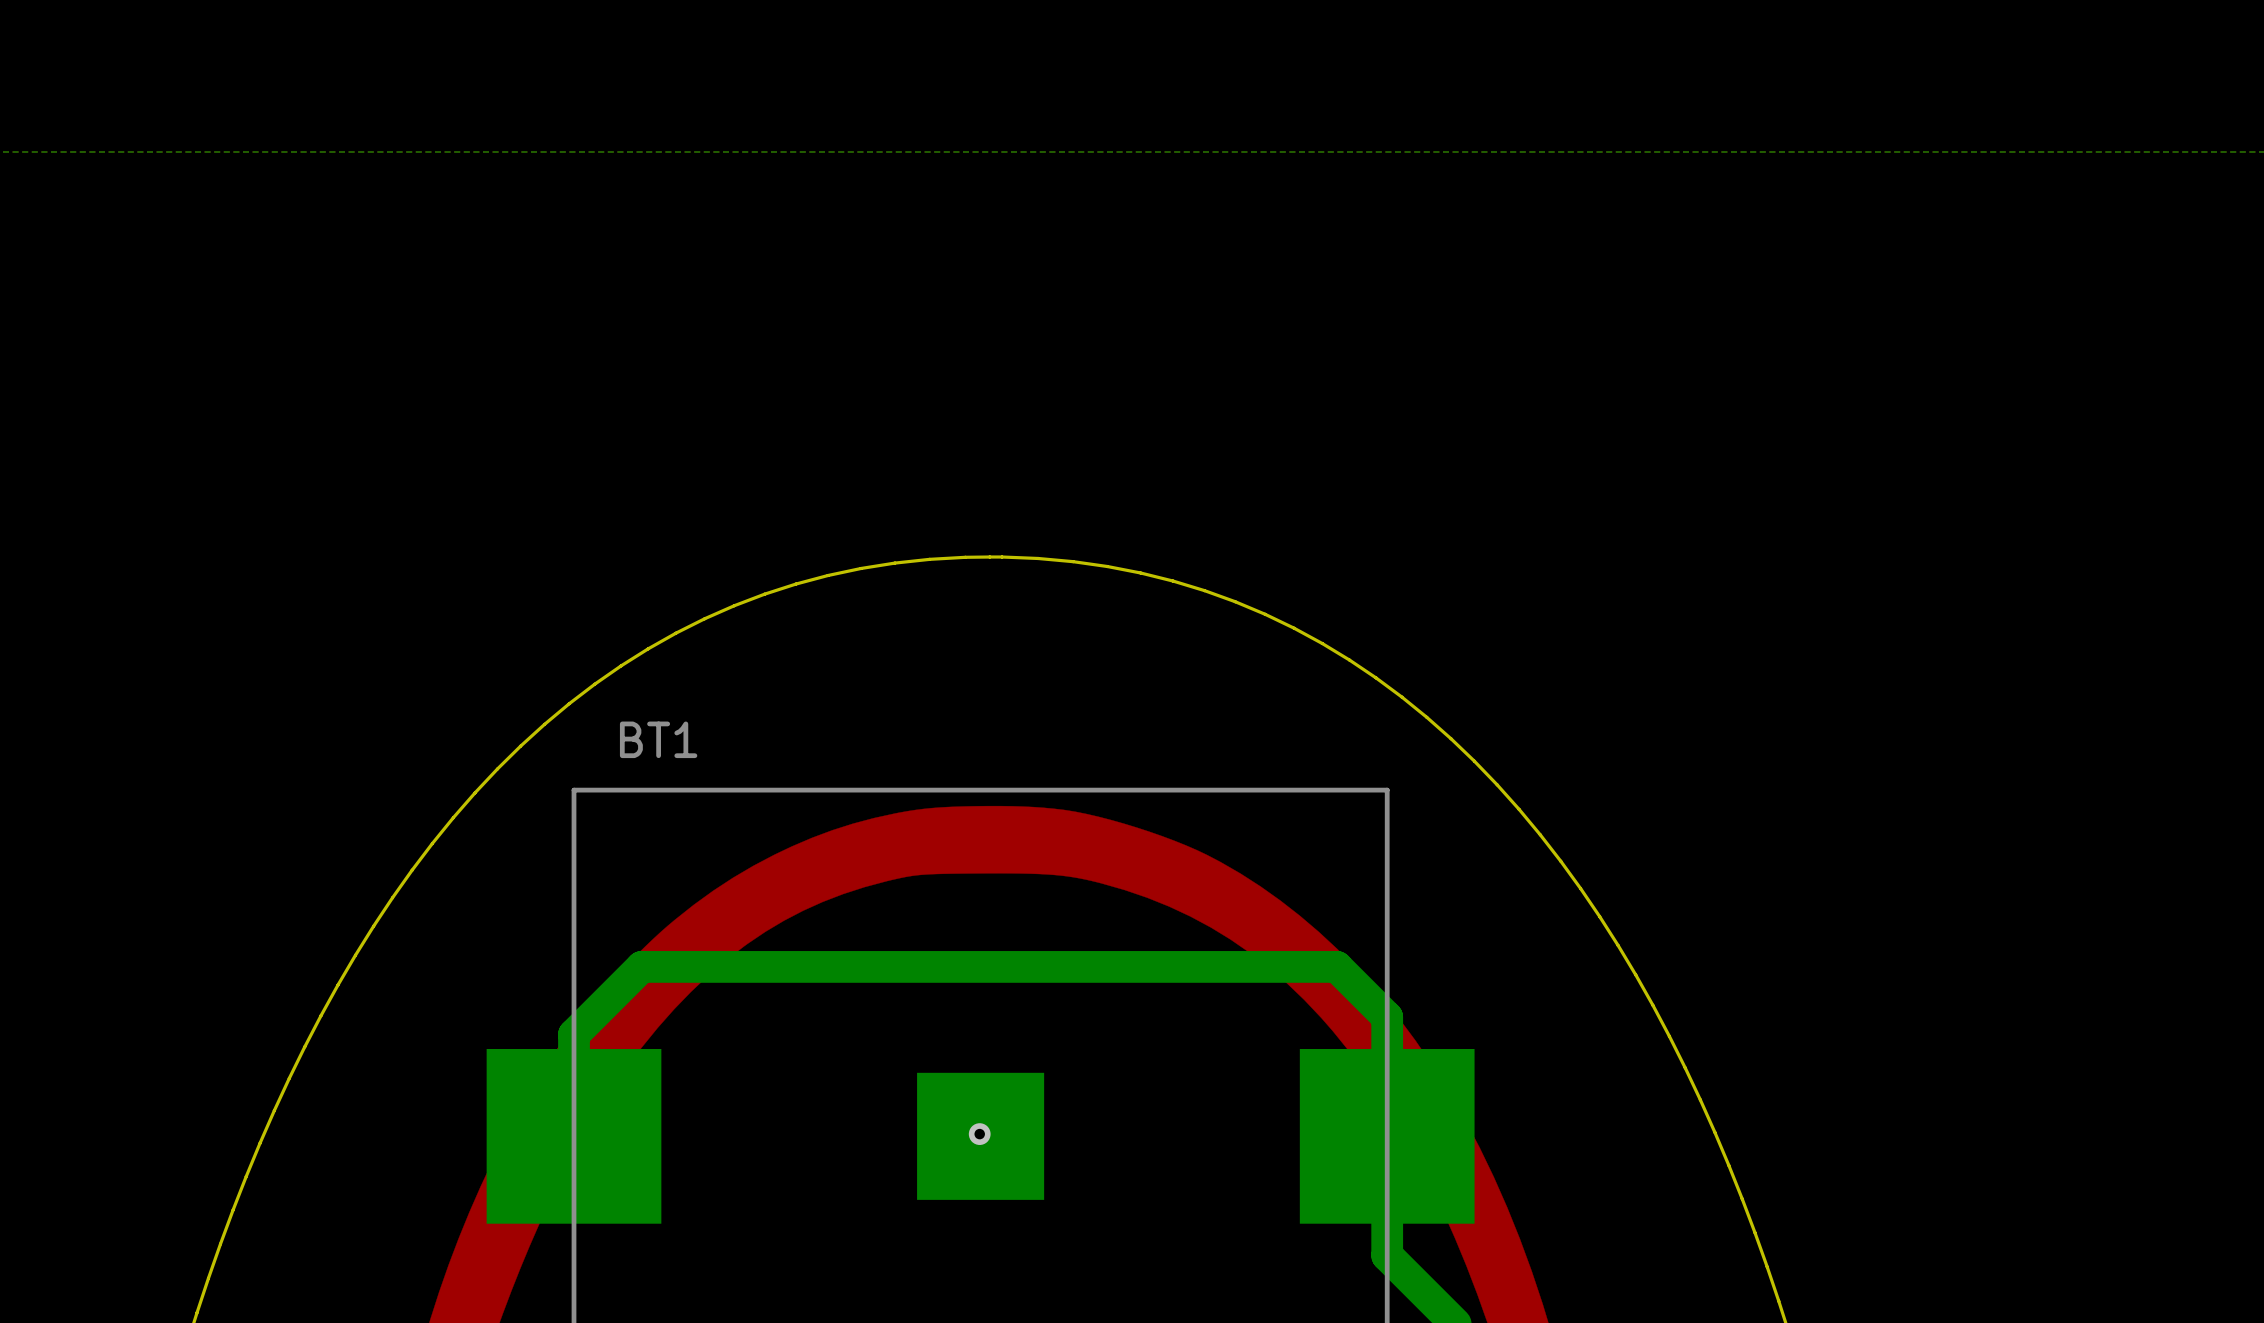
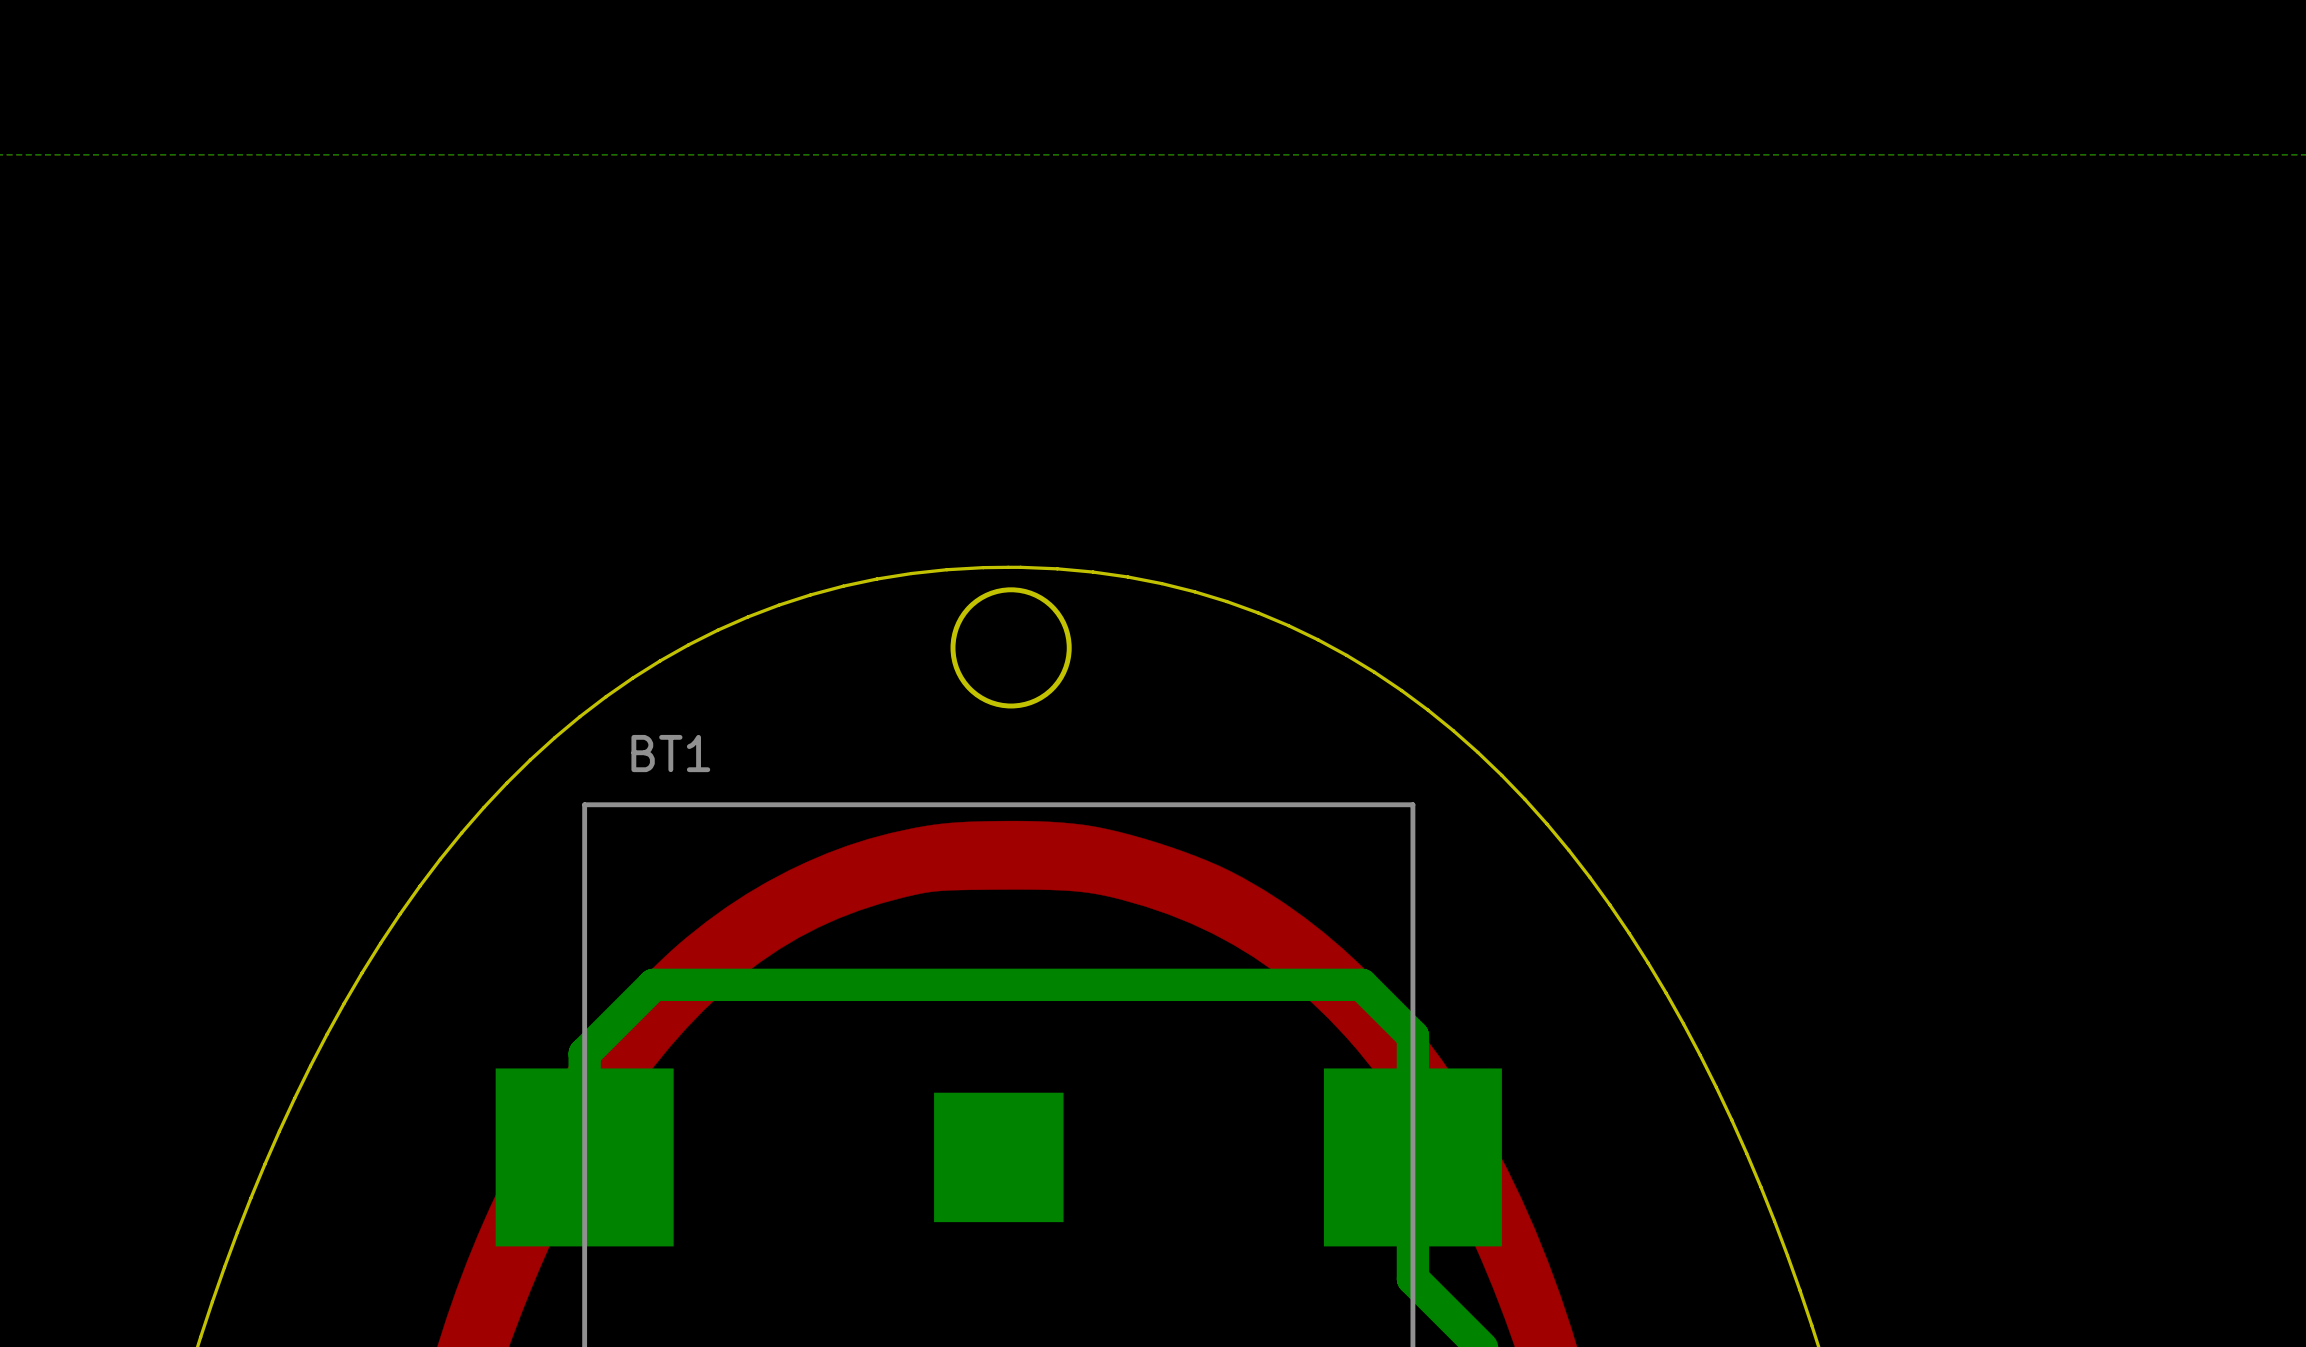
round board edge: none -> [950, 587, 1072, 709]
via: (979, 1134) -> none

